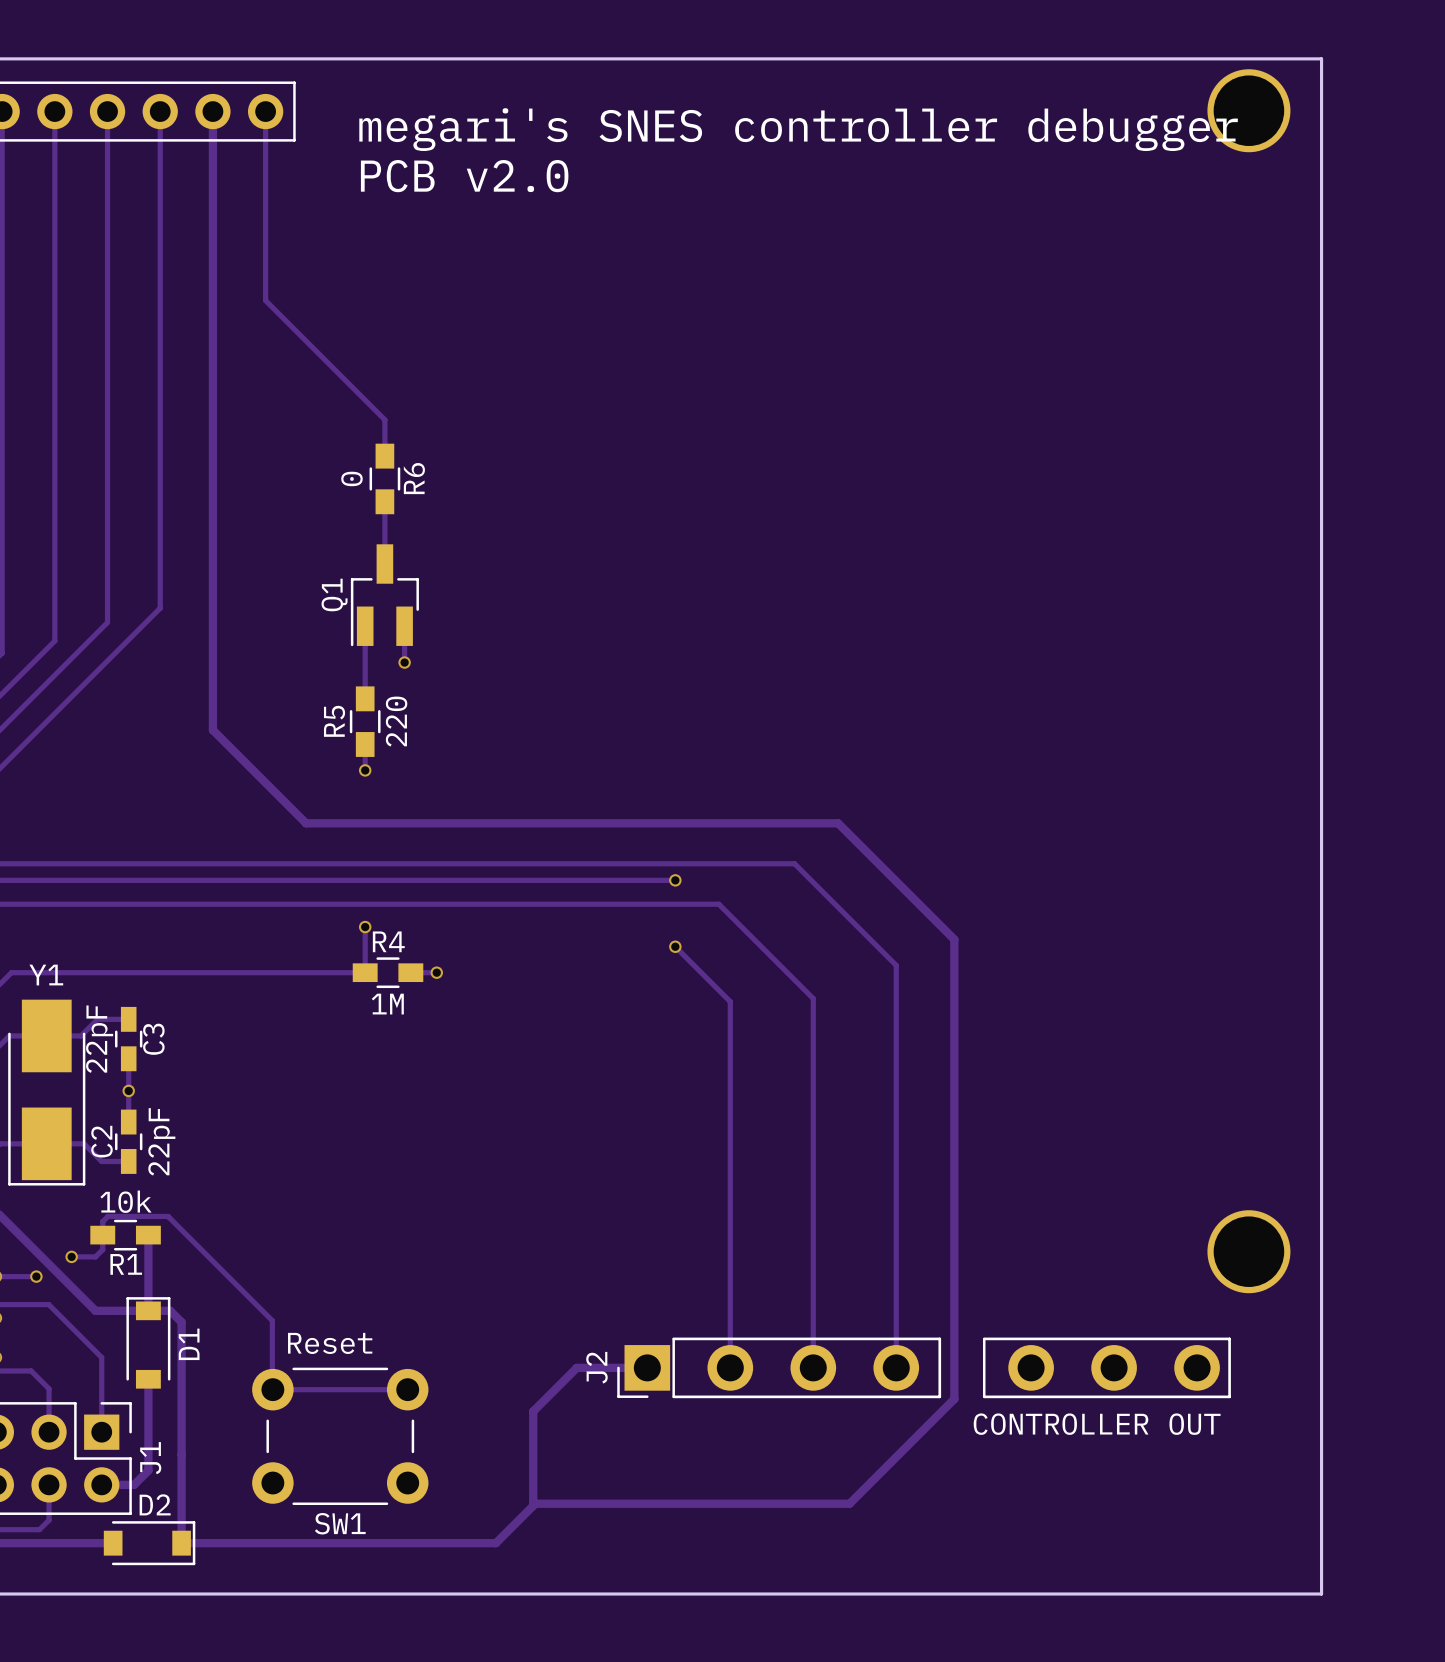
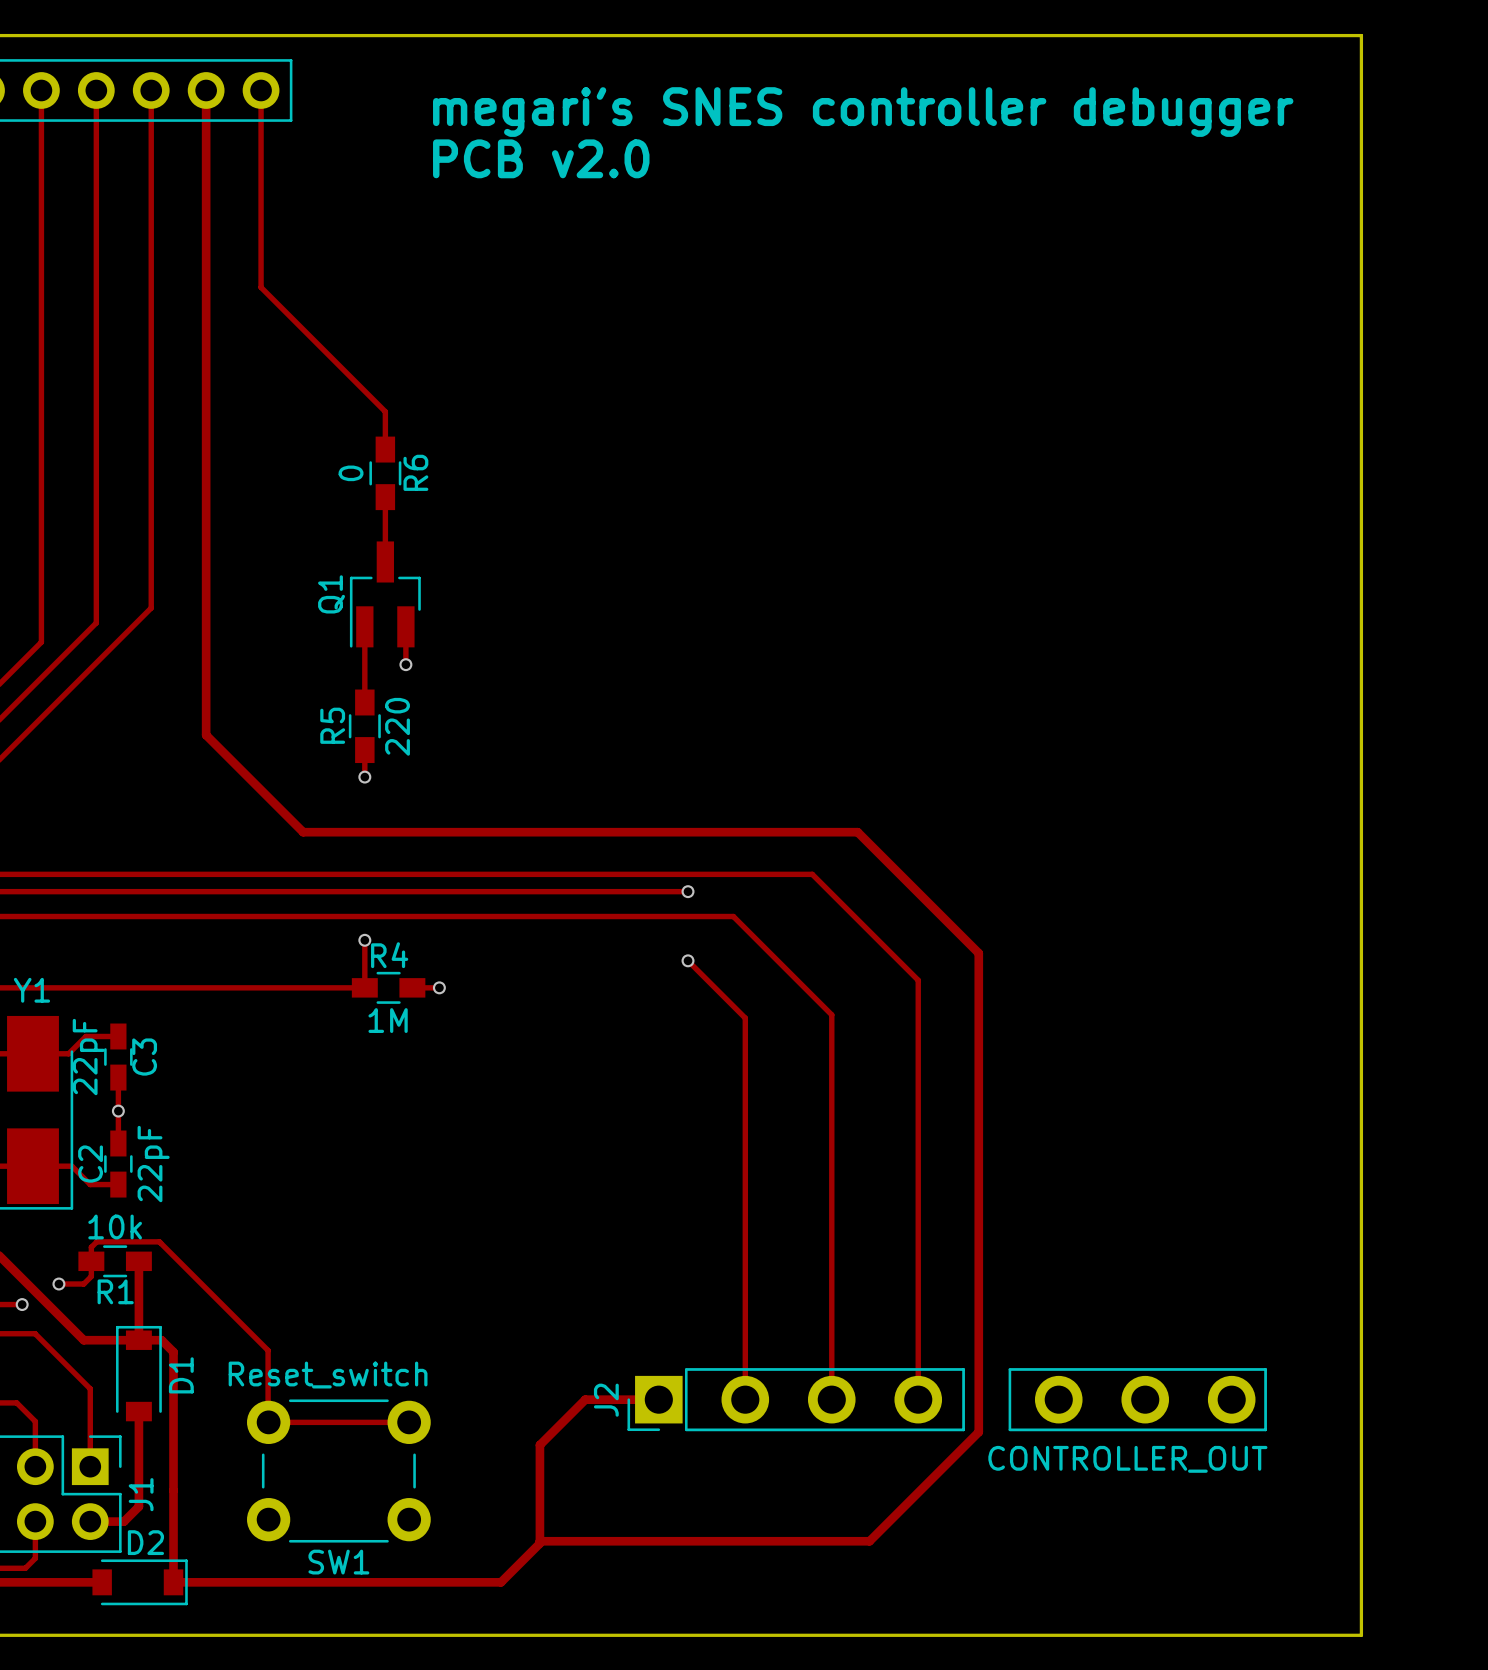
part: (1248, 110) -> none
text position: megari's SNES controller debugger (798, 129) -> megari's SNES controller debugger (863, 112)
text position: PCB v2.0 (464, 176) -> PCB v2.0 (541, 158)
part: (1248, 1251) -> none
SW1 value: Reset (330, 1343) -> Reset_switch (328, 1375)
J2 value: CONTROLLER OUT (1097, 1424) -> CONTROLLER_OUT (1127, 1459)

